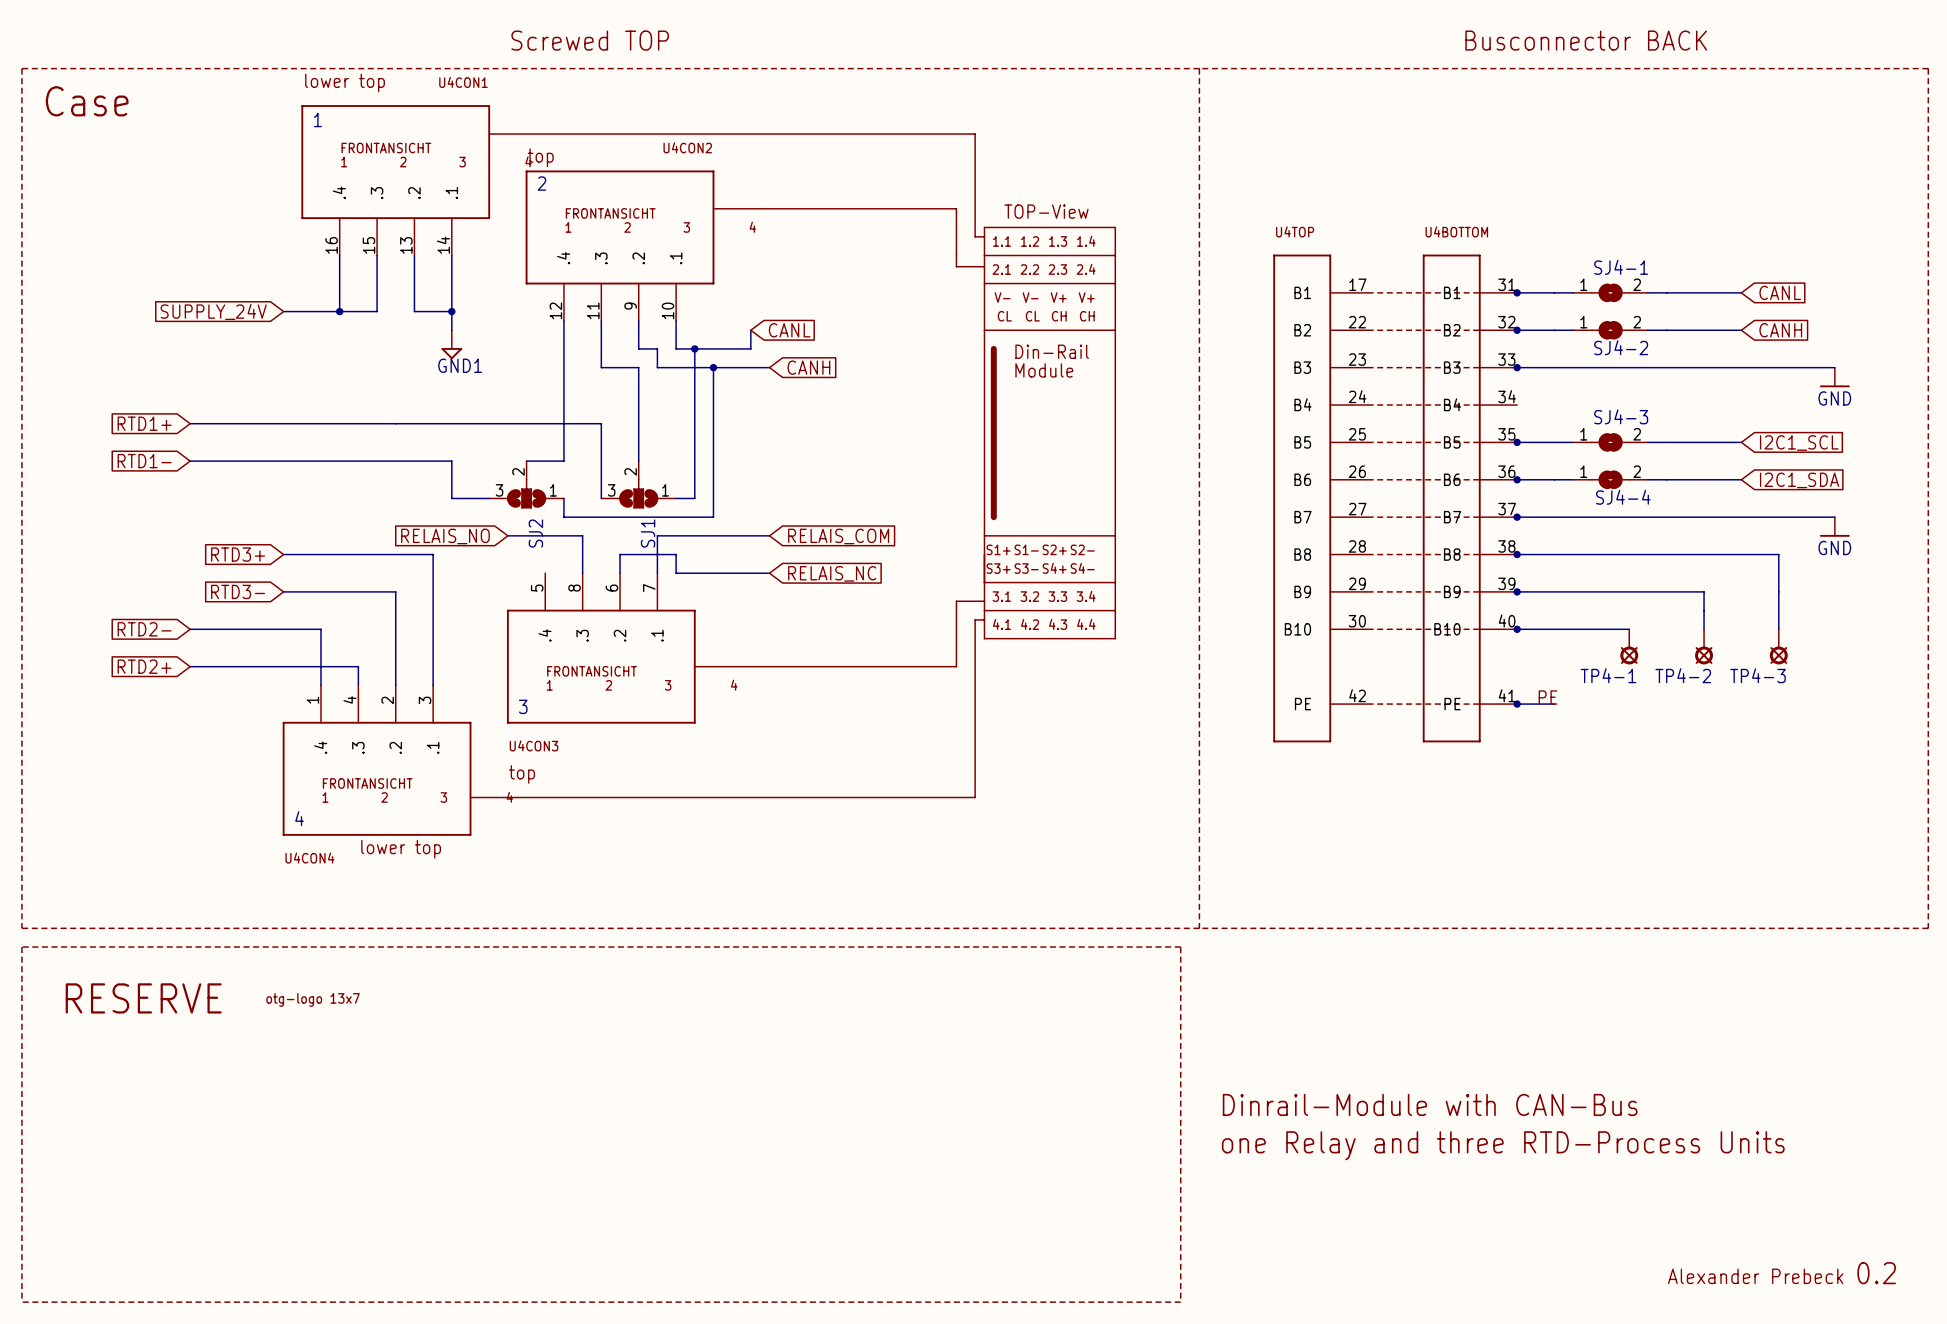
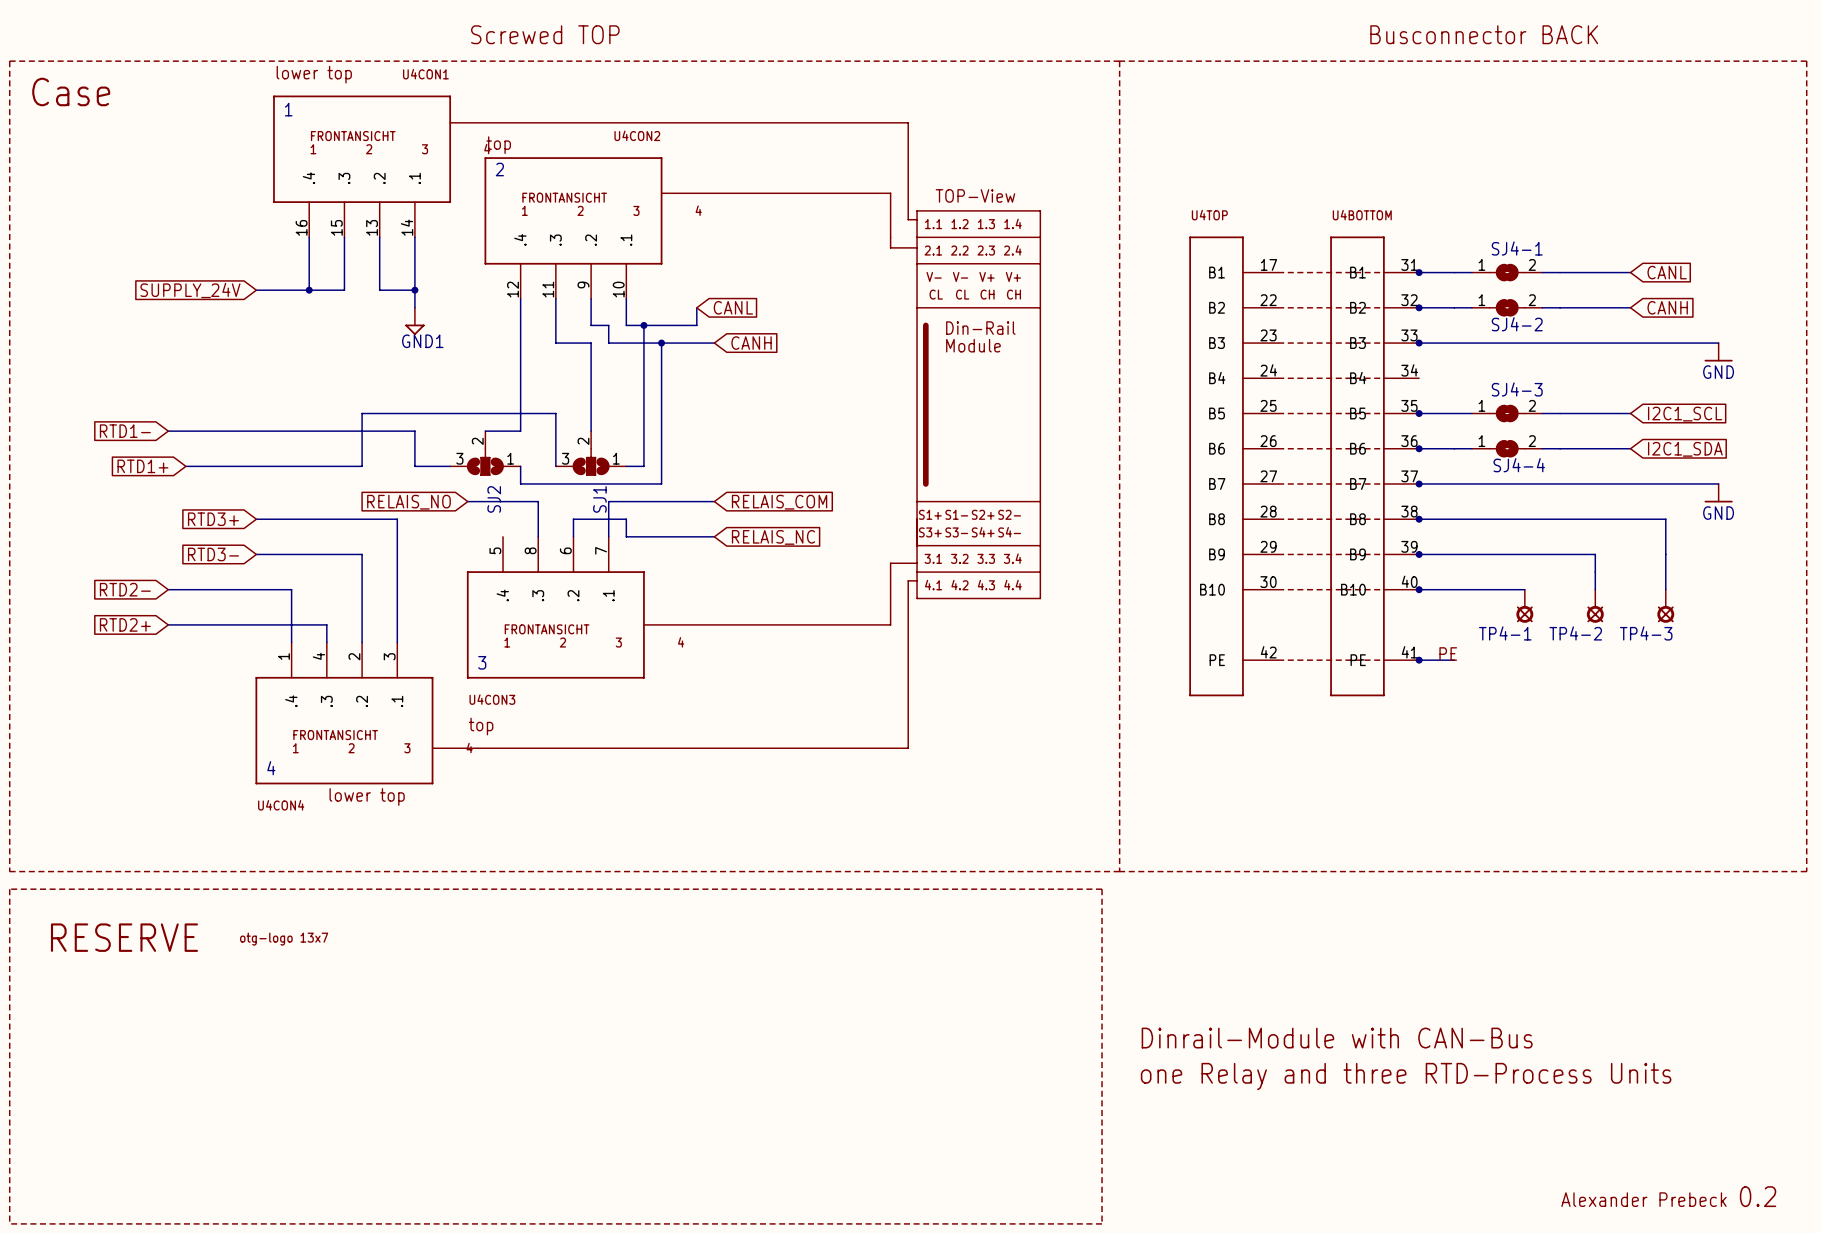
global label position: RTD1+ (144, 423) -> RTD1+ (142, 466)
wire: (190, 423) (601, 423) (601, 442) -> (185, 466) (362, 466) (362, 413) (555, 413)

